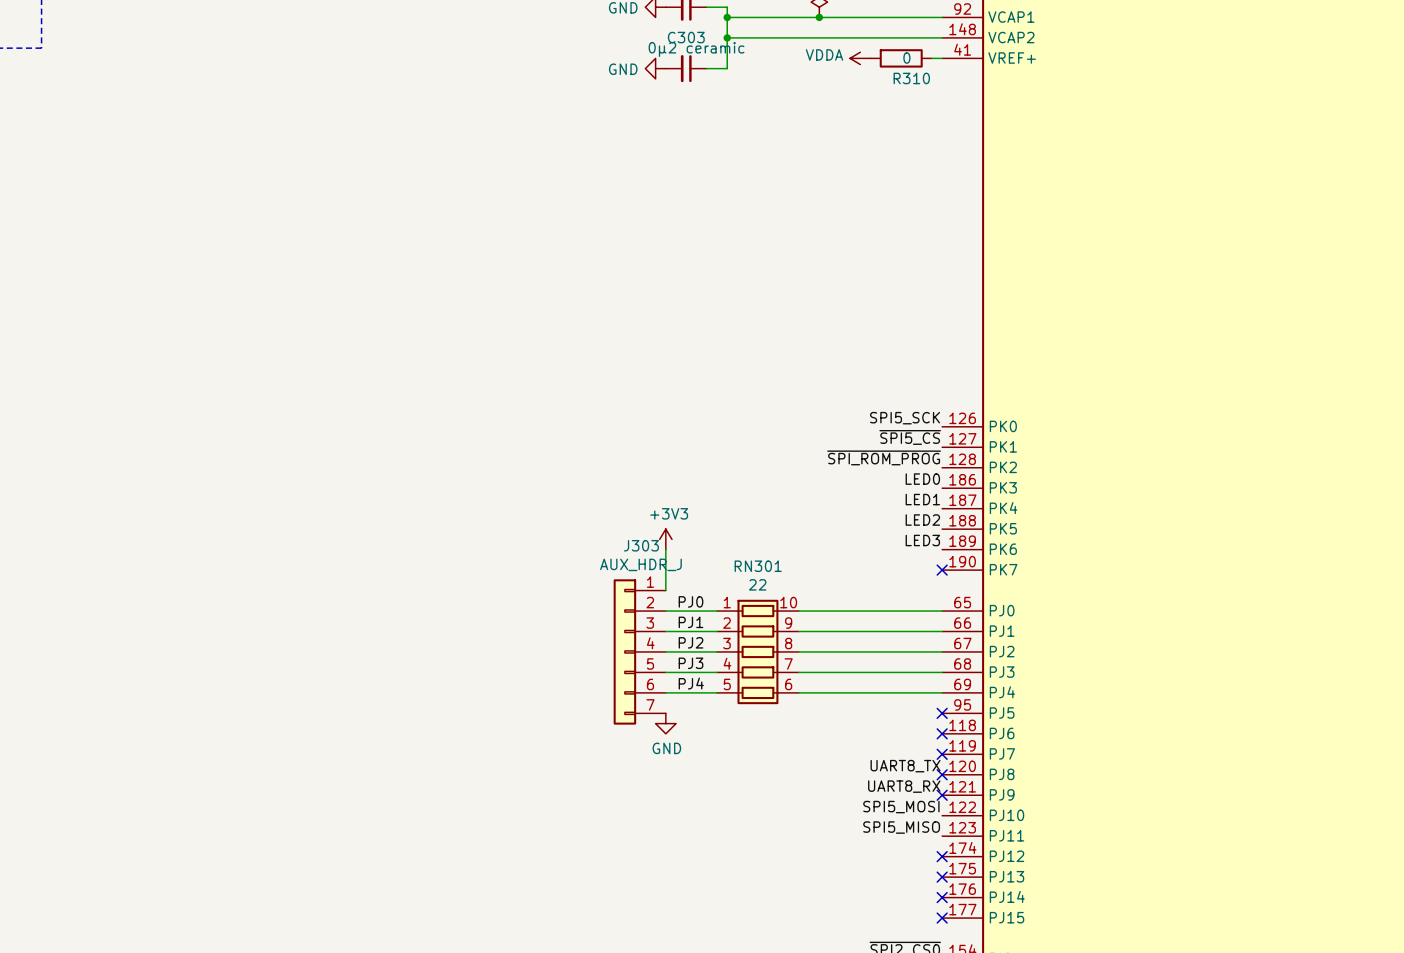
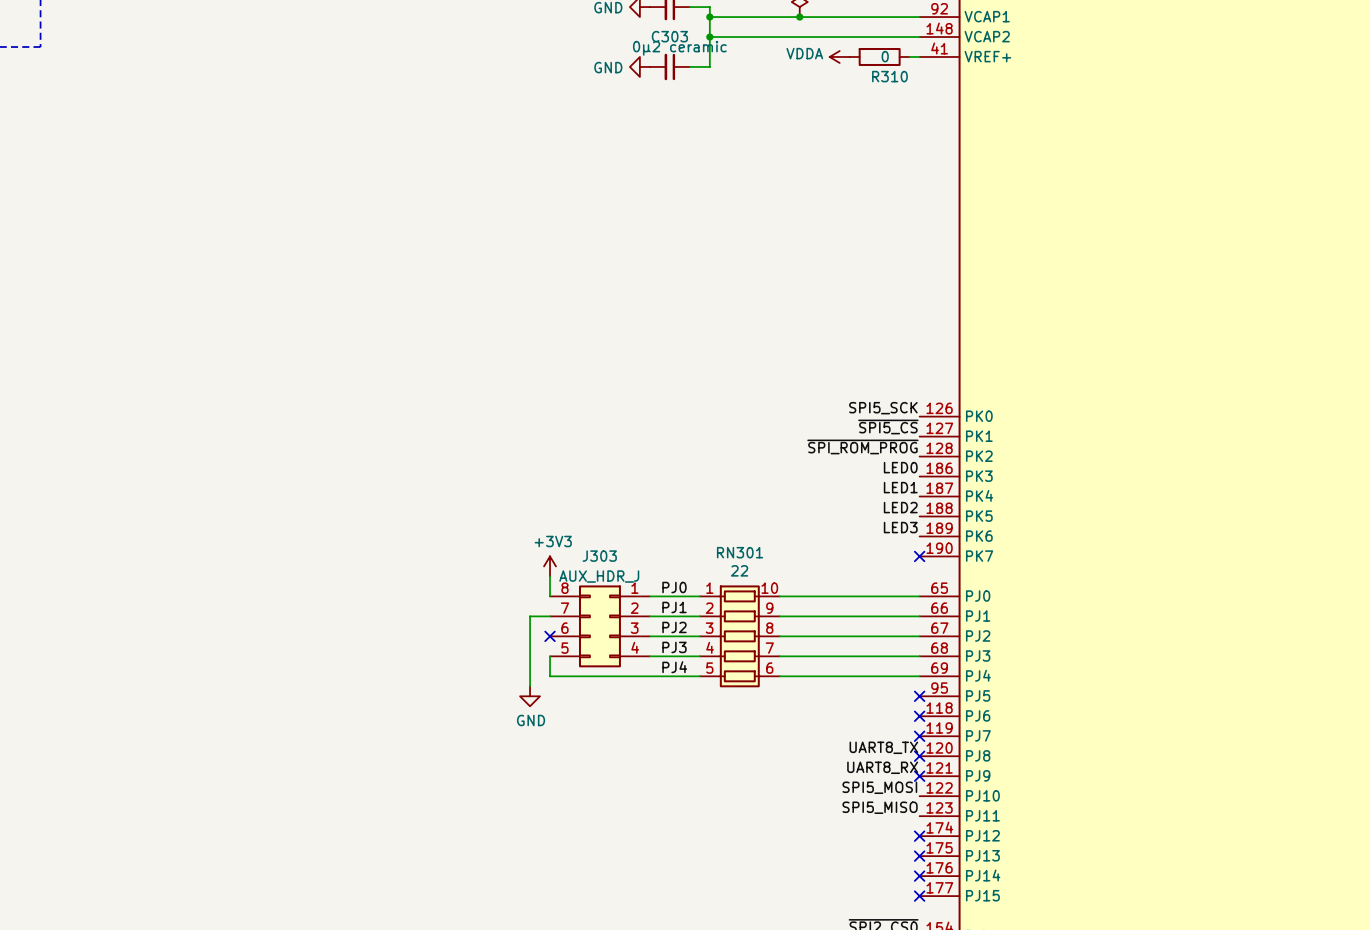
power symbol position: +3V3 (665, 539) -> +3V3 (550, 566)
J303 name position: J303 (641, 545) -> J303 (599, 556)
wire: (665, 549) (665, 590) -> none
J303 value position: AUX_HDR_J (640, 564) -> AUX_HDR_J (599, 576)
J303 symbol: [613, 579, 666, 725] -> [550, 585, 650, 668]
wire: none -> (550, 576) (550, 596)
wire: none -> (550, 616) (530, 616) (530, 686)
no-connect mark: none -> (550, 636)
wire: none -> (550, 656) (550, 676) (649, 676)
power symbol position: GND (665, 723) -> GND (530, 696)

